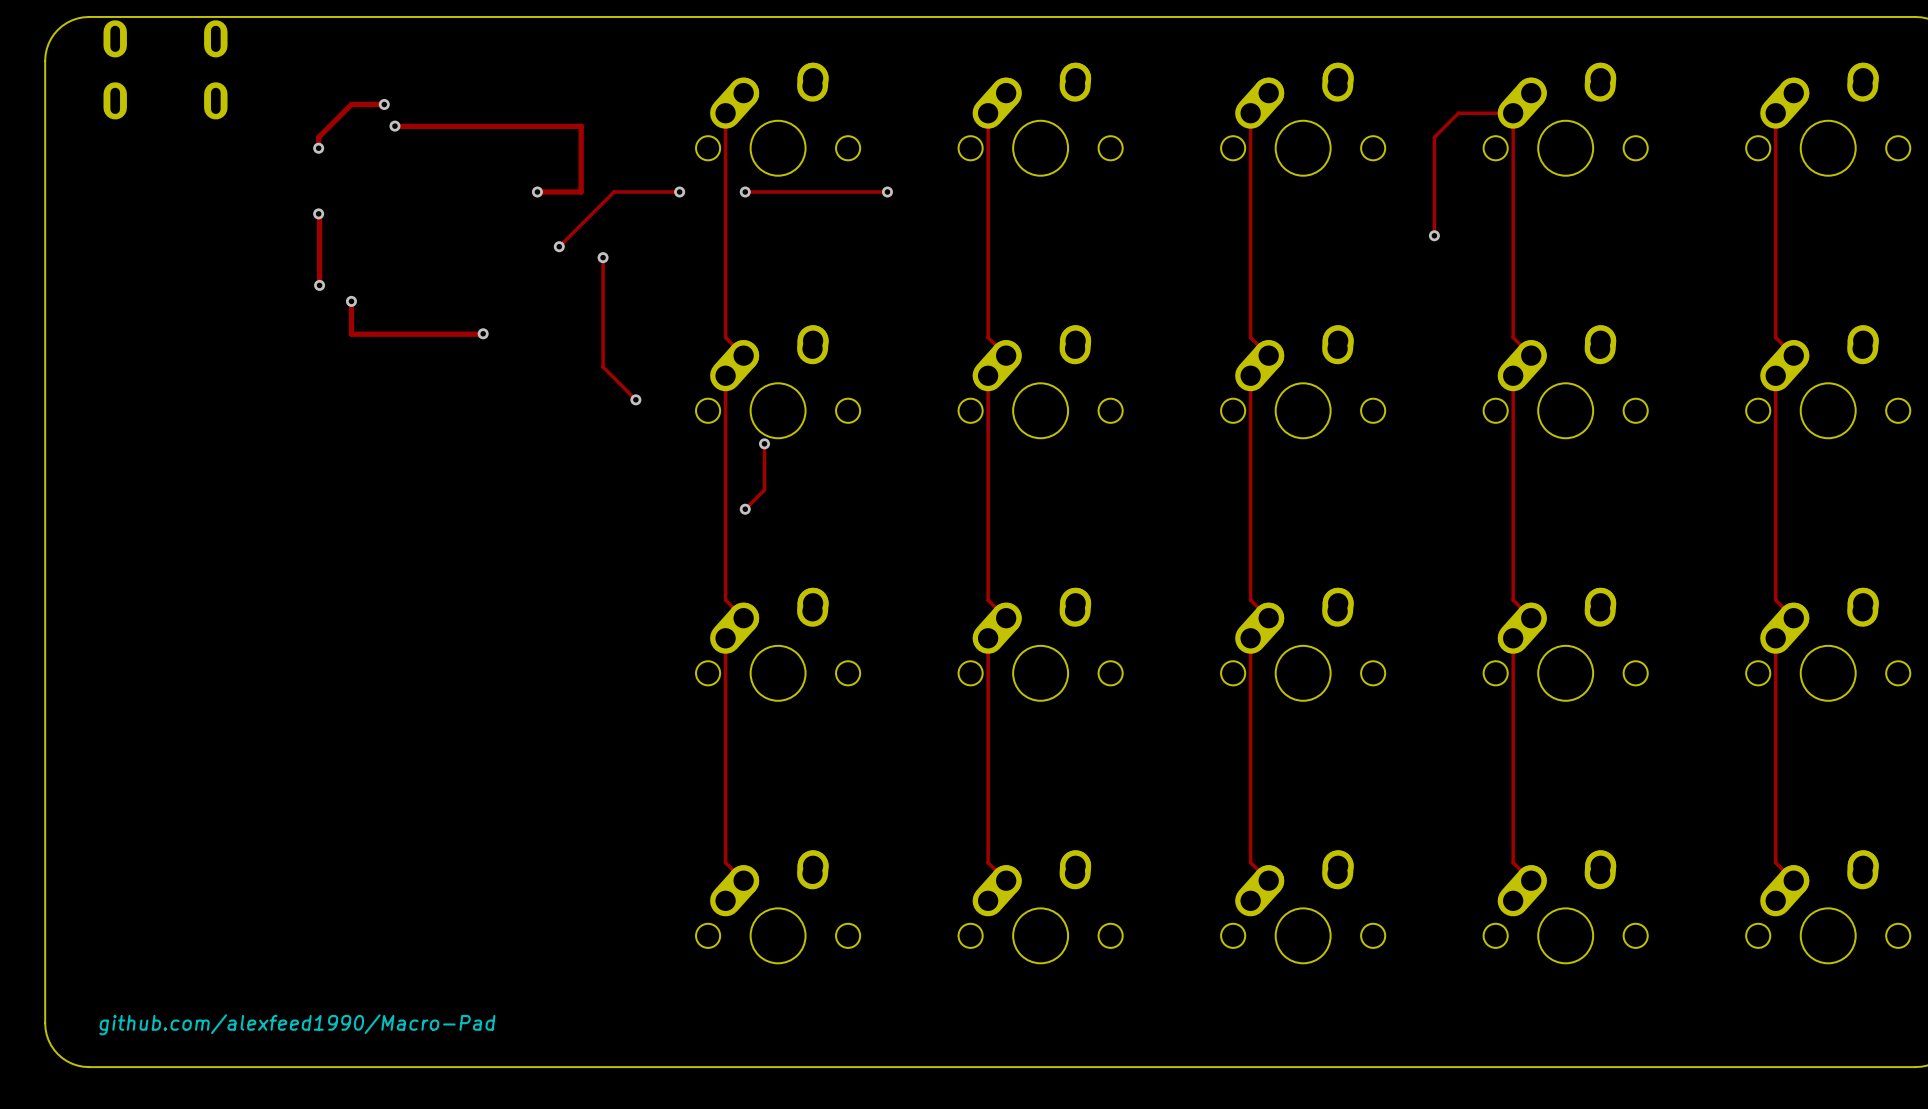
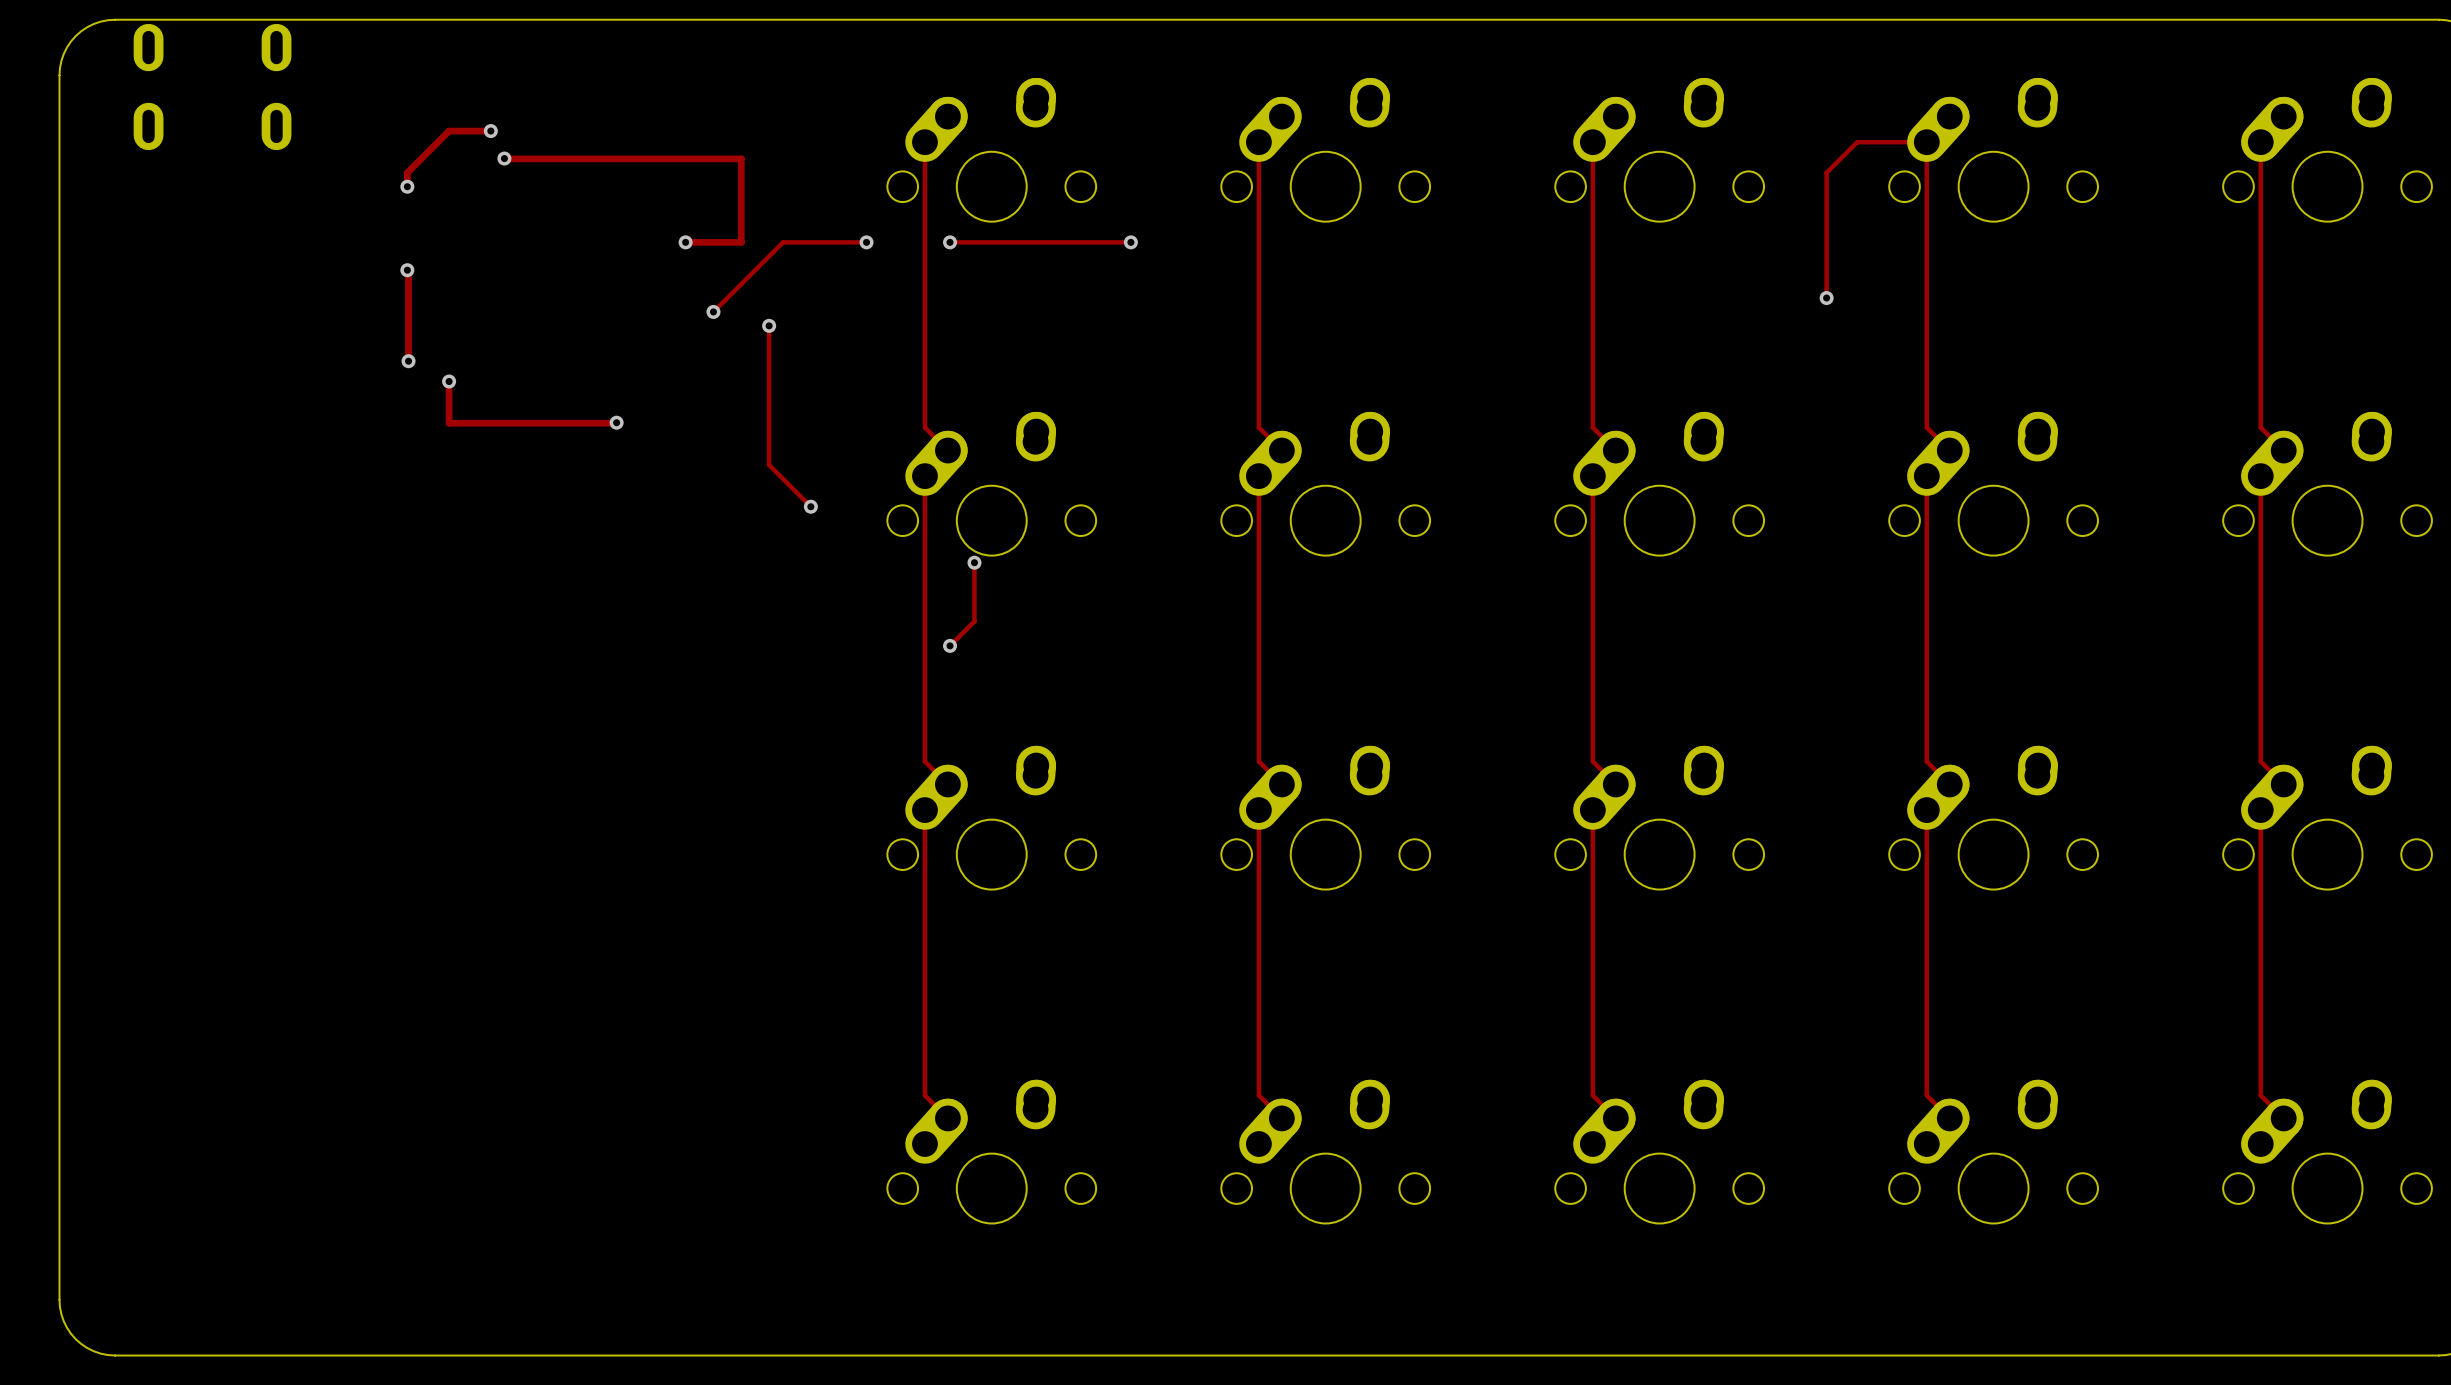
text: github.com/alexfeed1990/Macro-Pad (297, 1024) -> none

